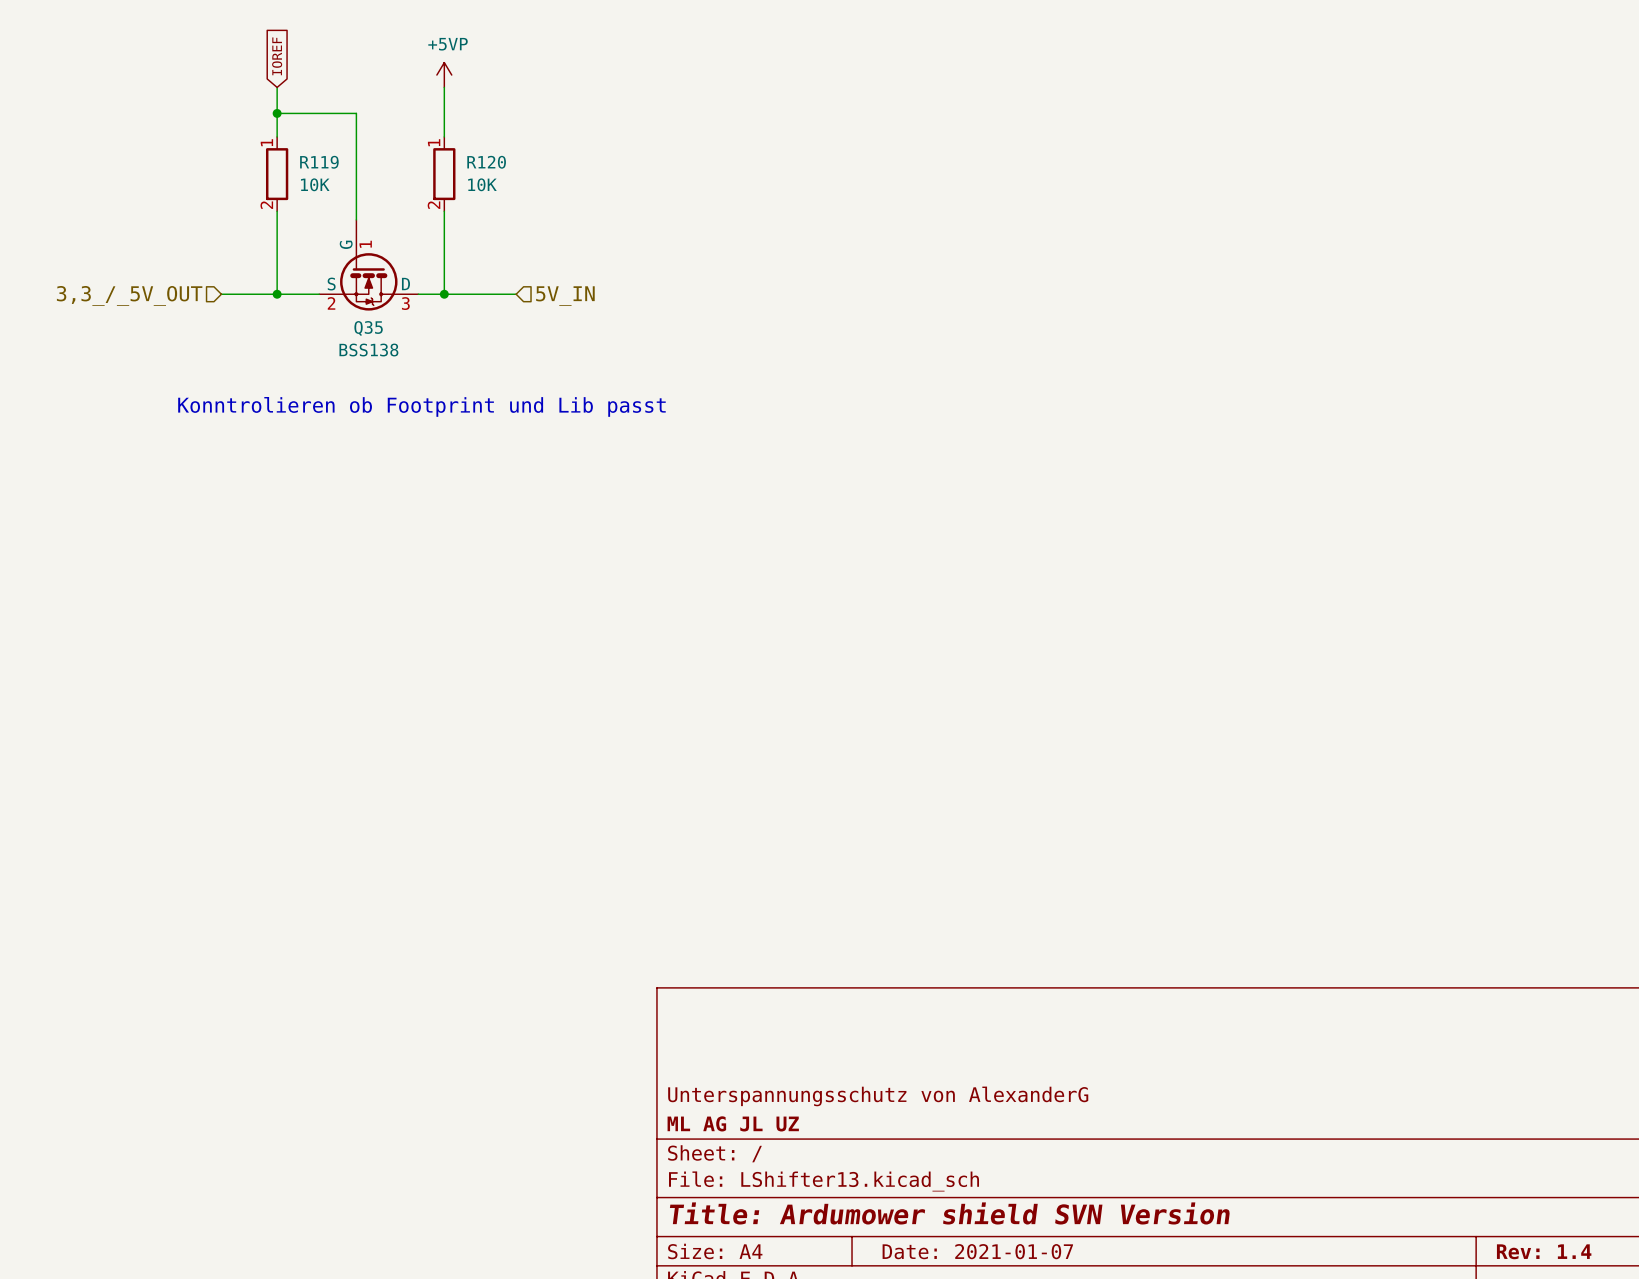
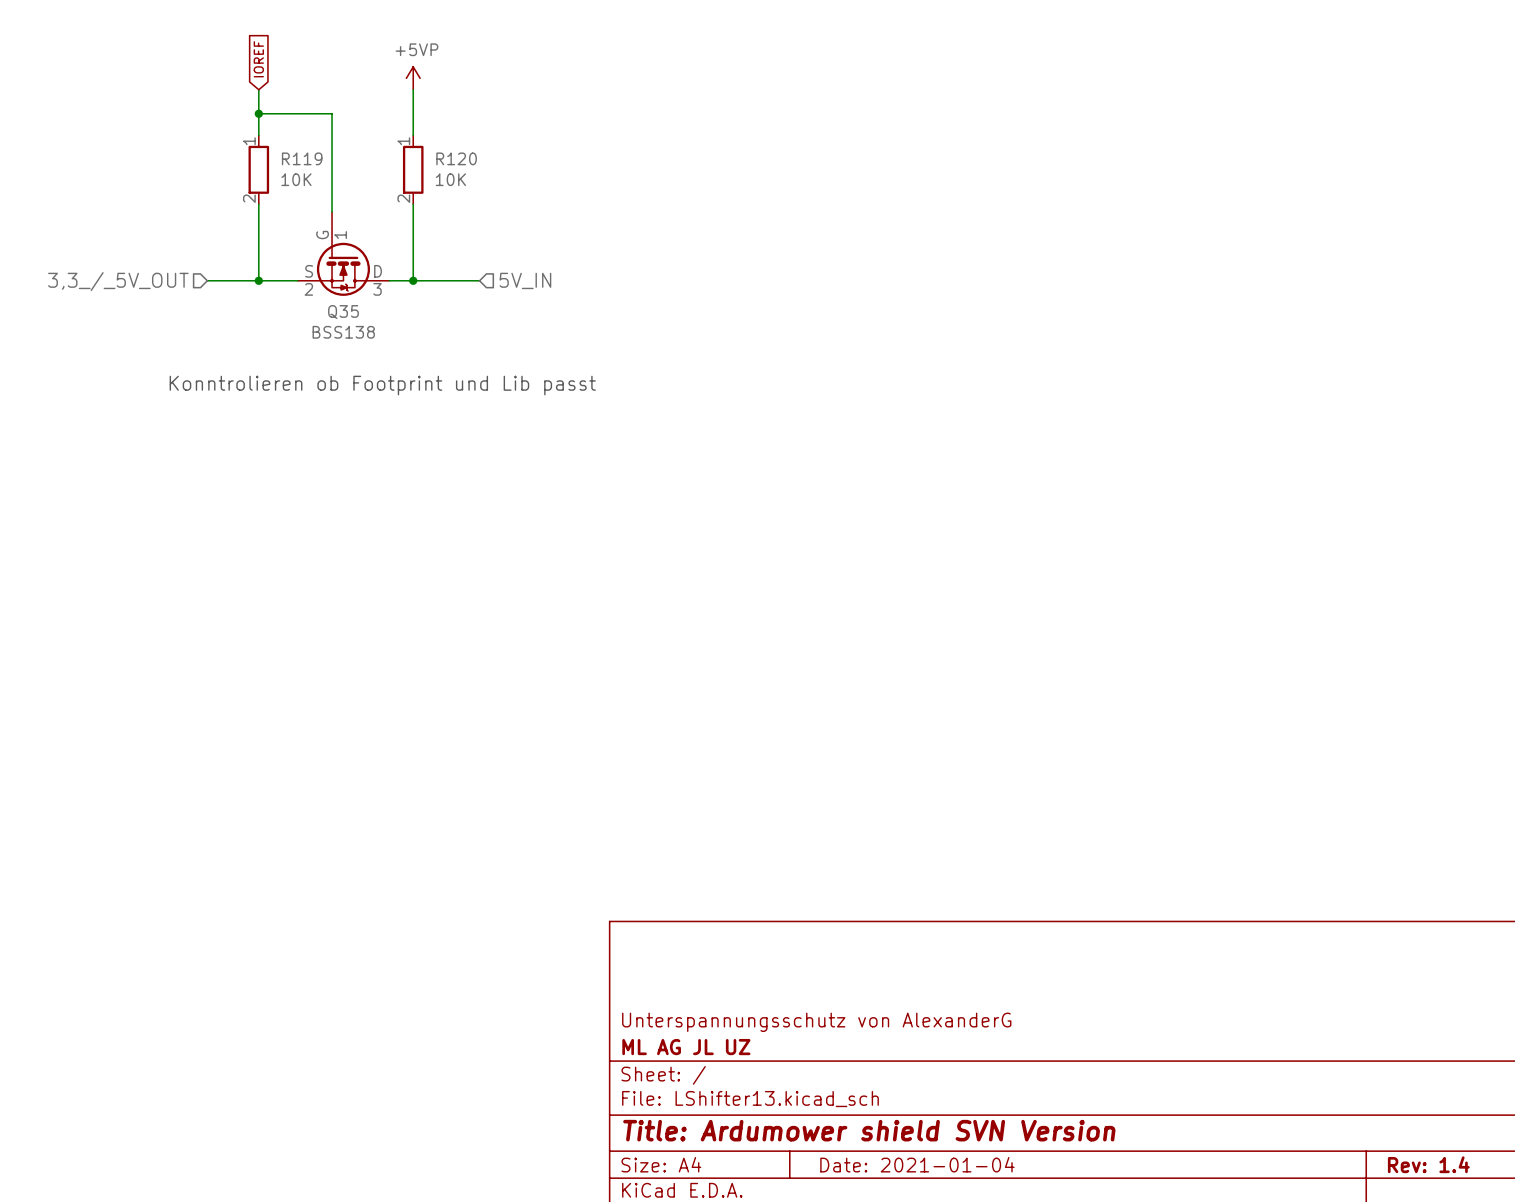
title block: Date: 2021-01-07 (977, 1251) -> Date: 2021-01-04 (917, 1164)

